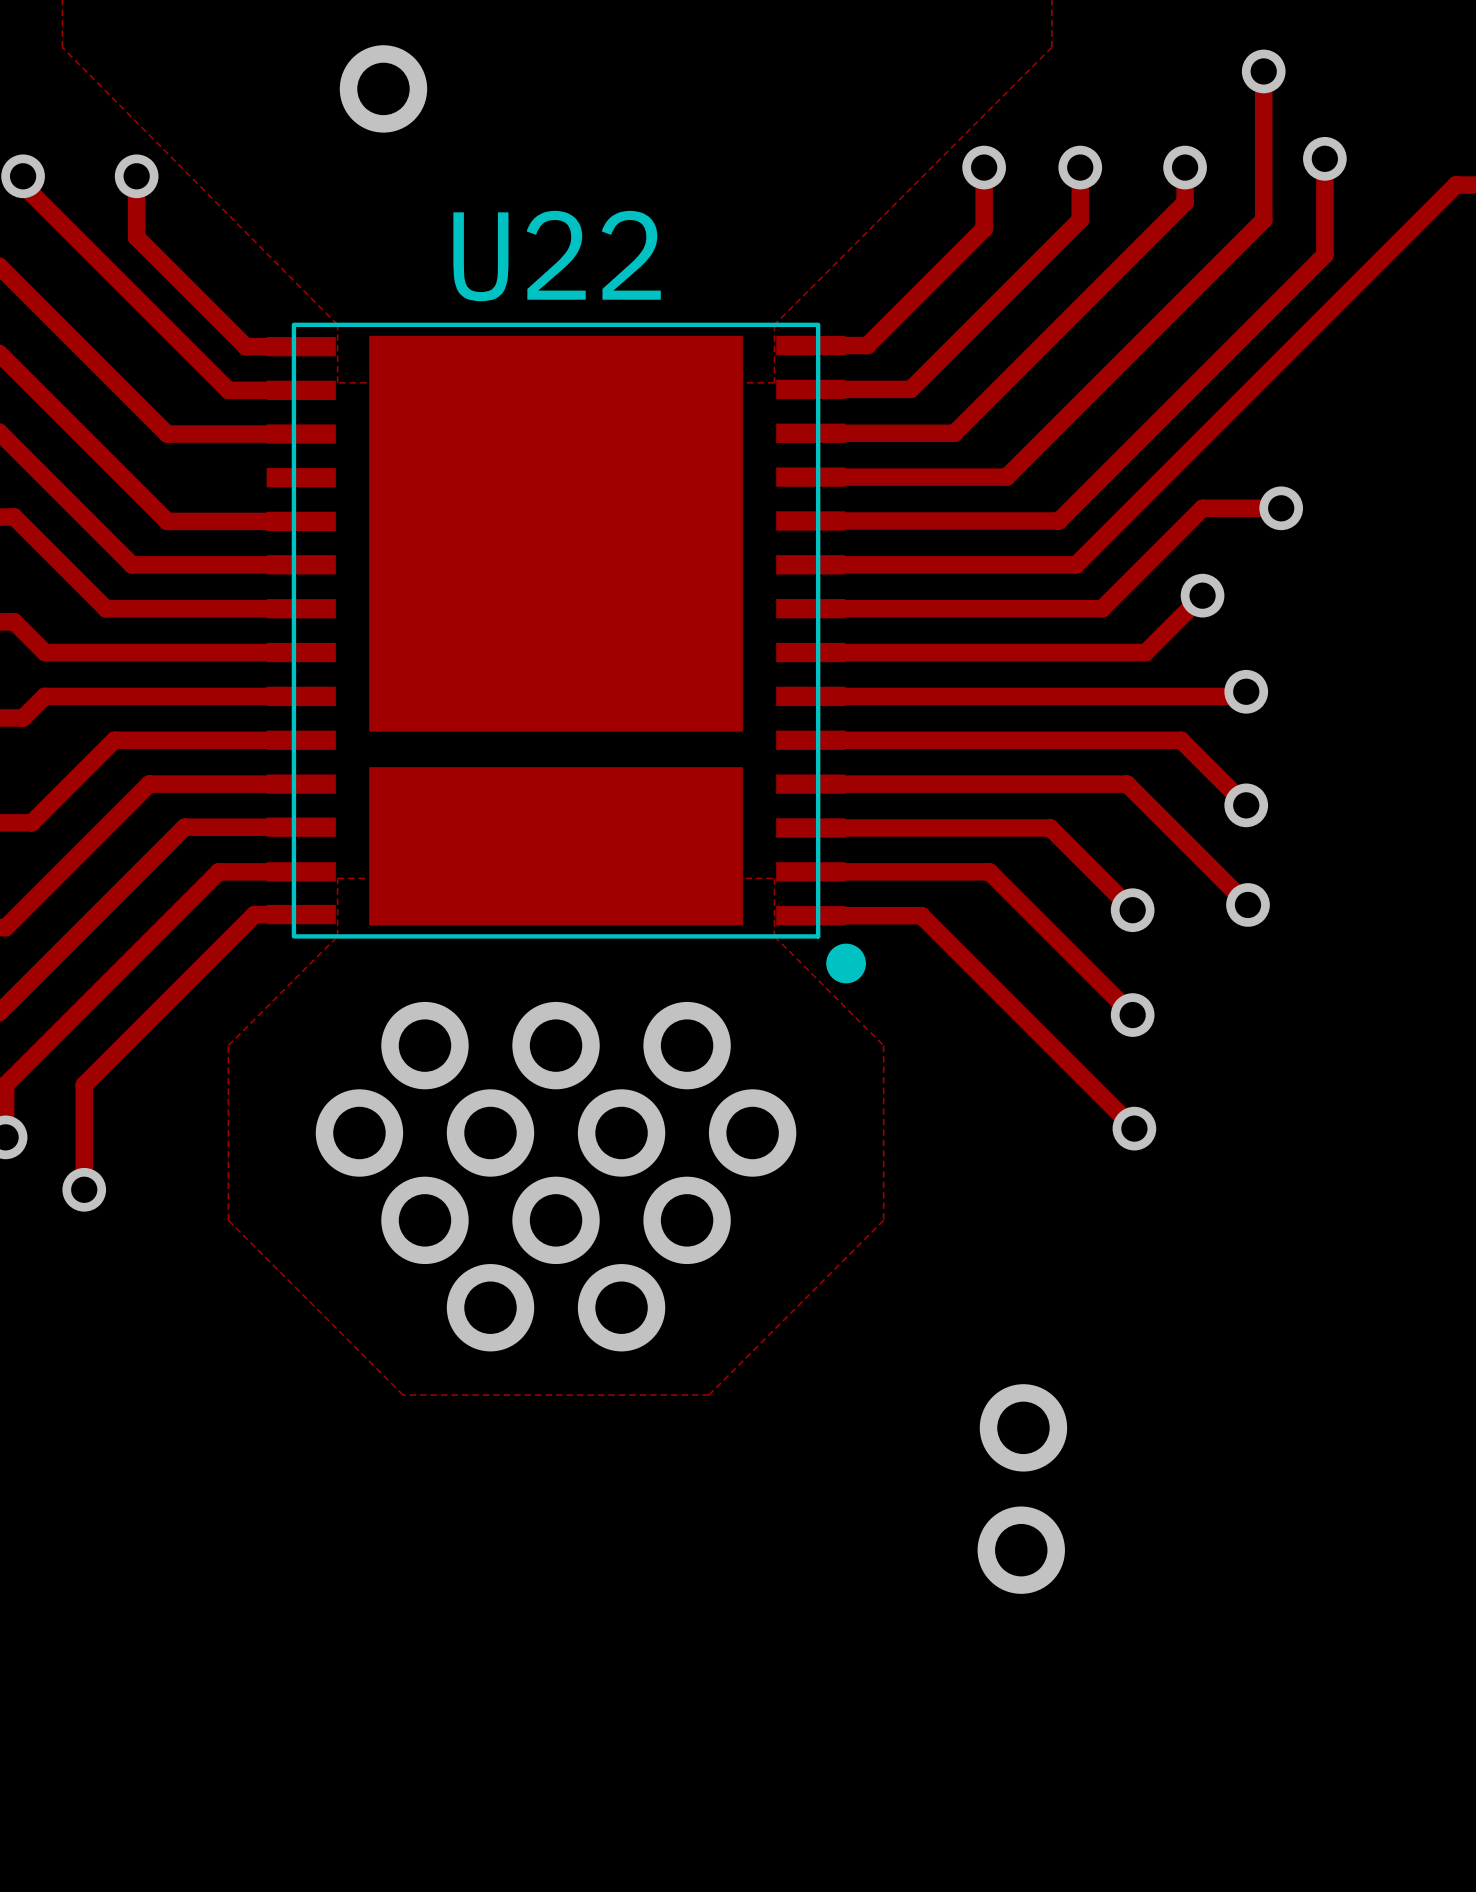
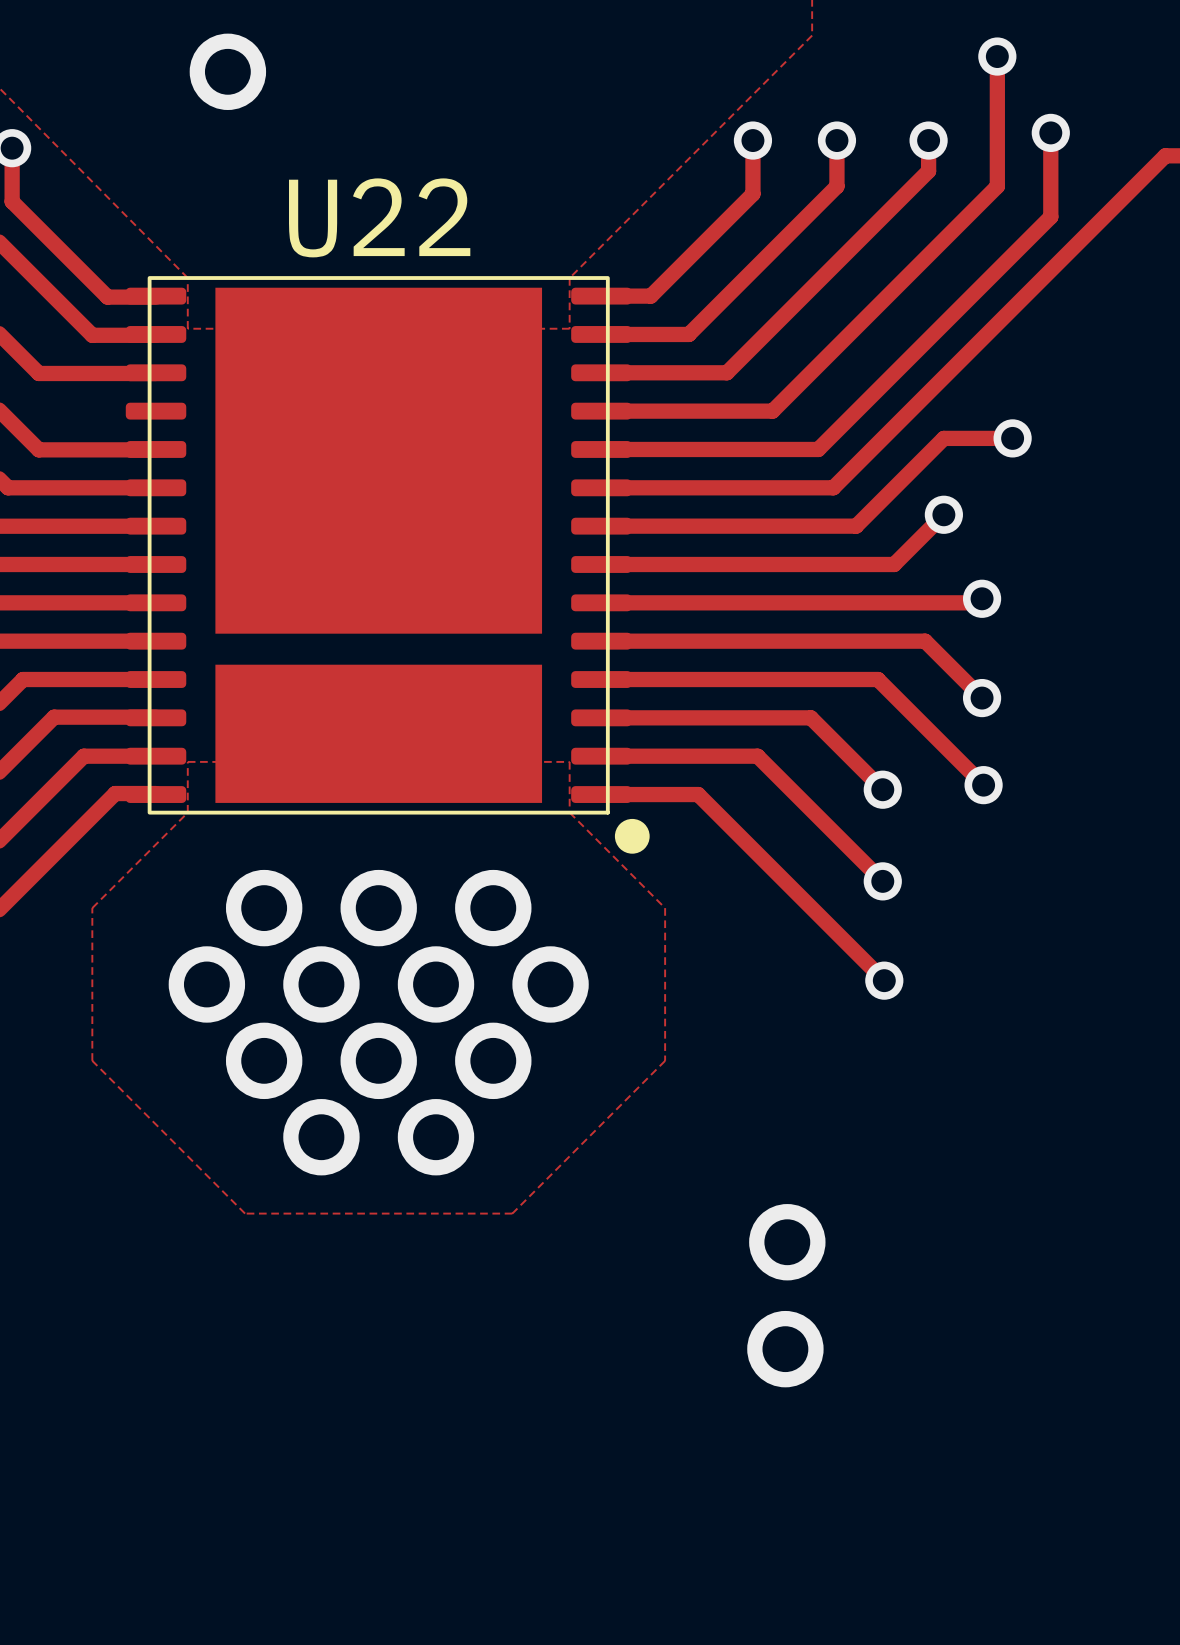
U22 footprint: [266, 322, 866, 984] -> [125, 276, 650, 854]

